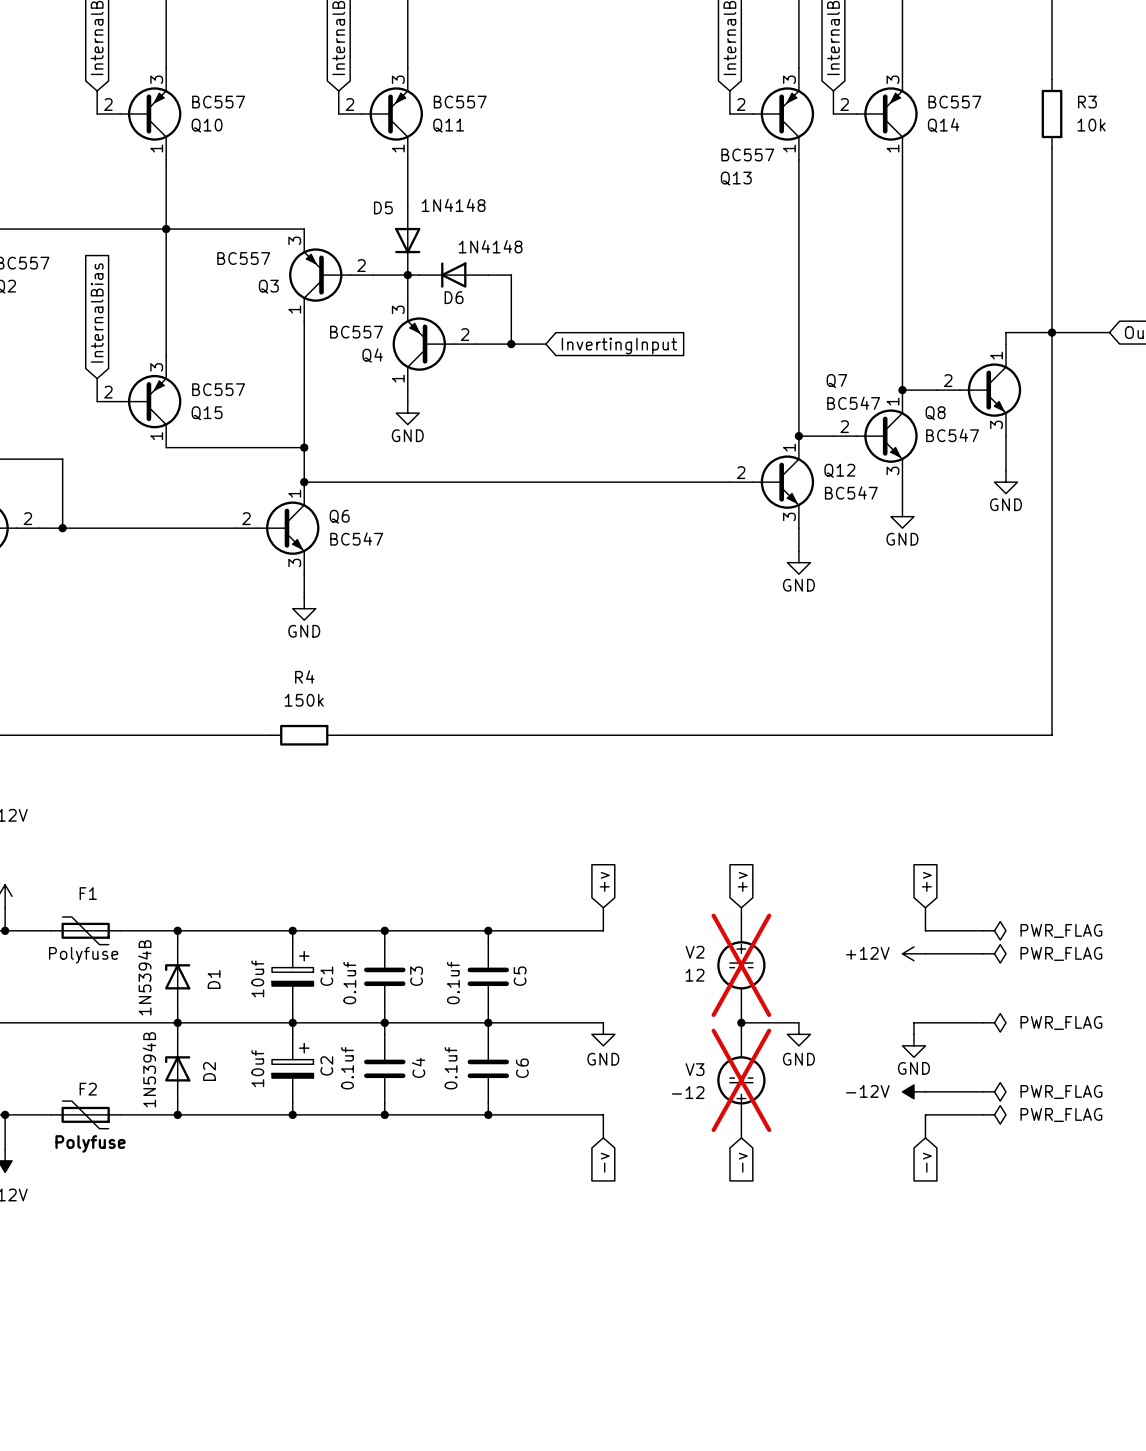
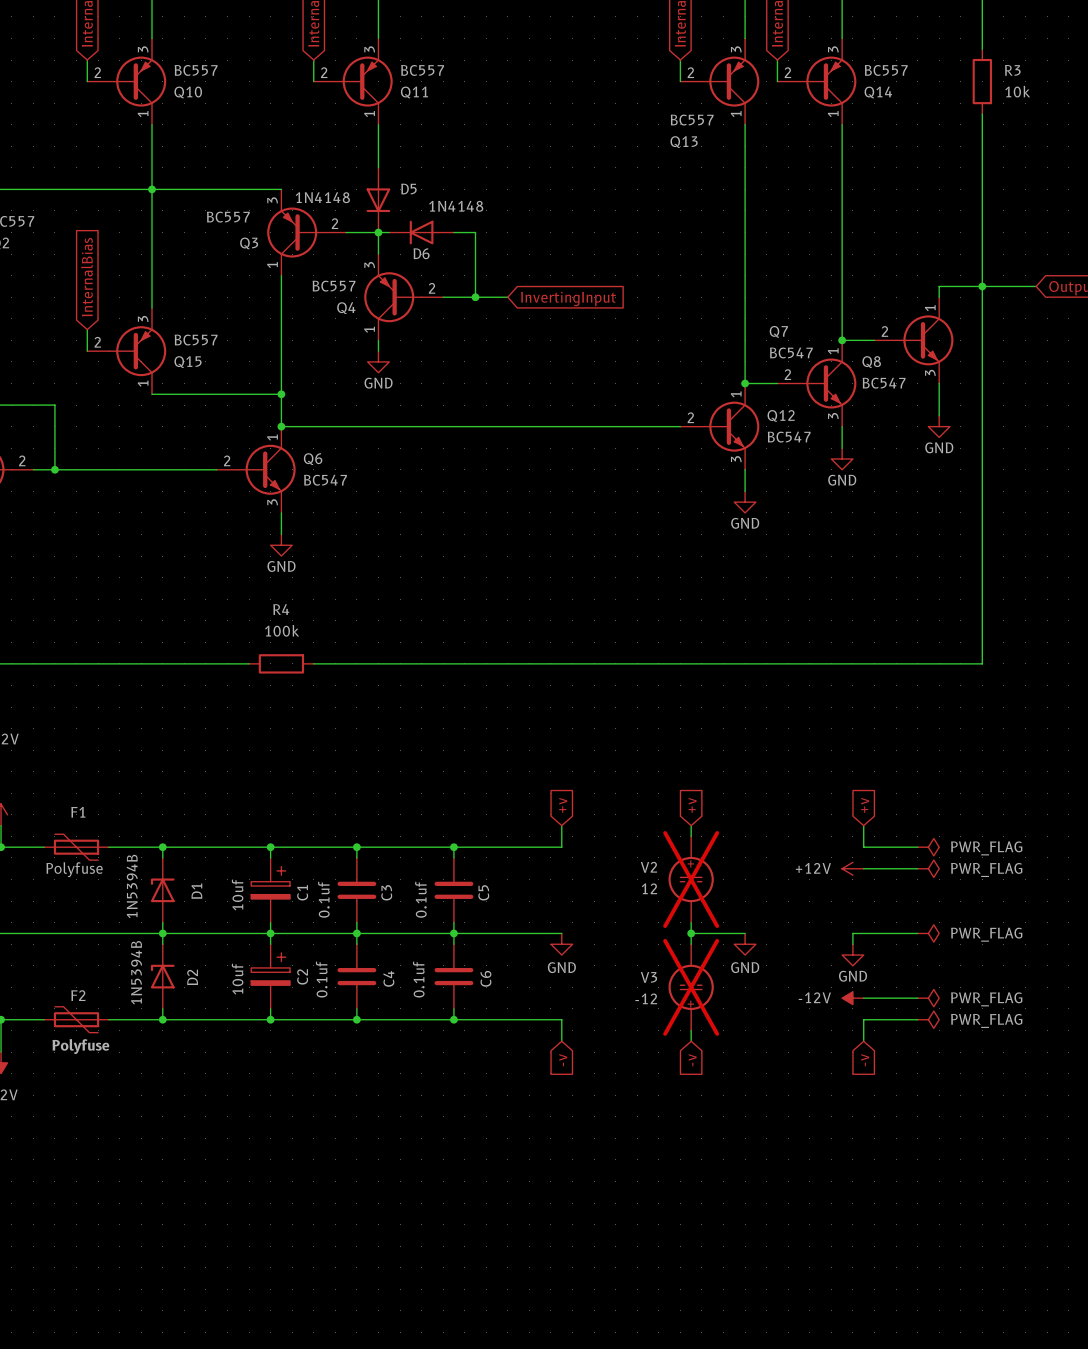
D5 value position: 1N4148 (453, 205) -> 1N4148 (322, 197)
D5 name position: D5 (383, 207) -> D5 (408, 189)
R4 value: 150k (304, 700) -> 100k (282, 630)

